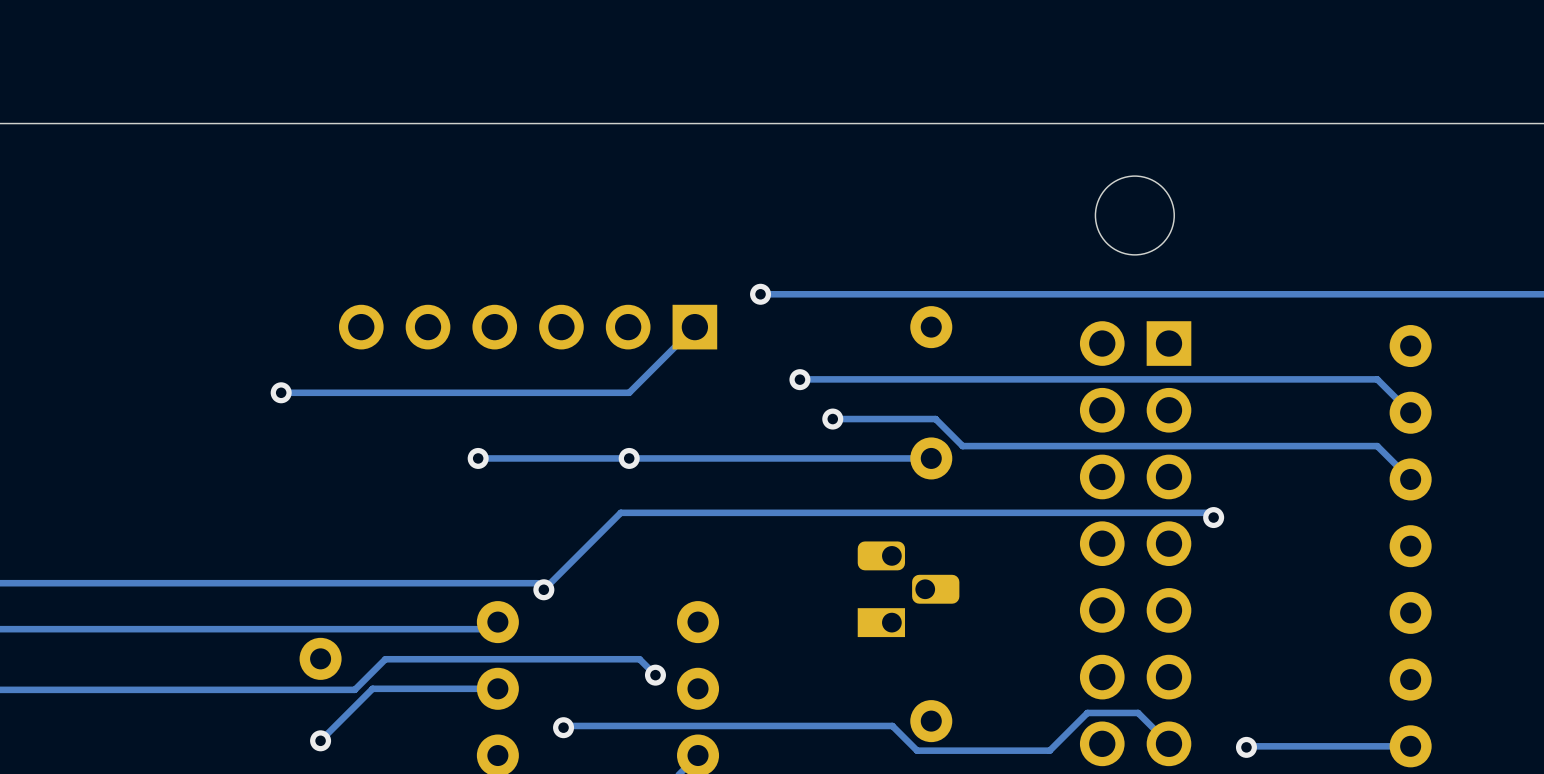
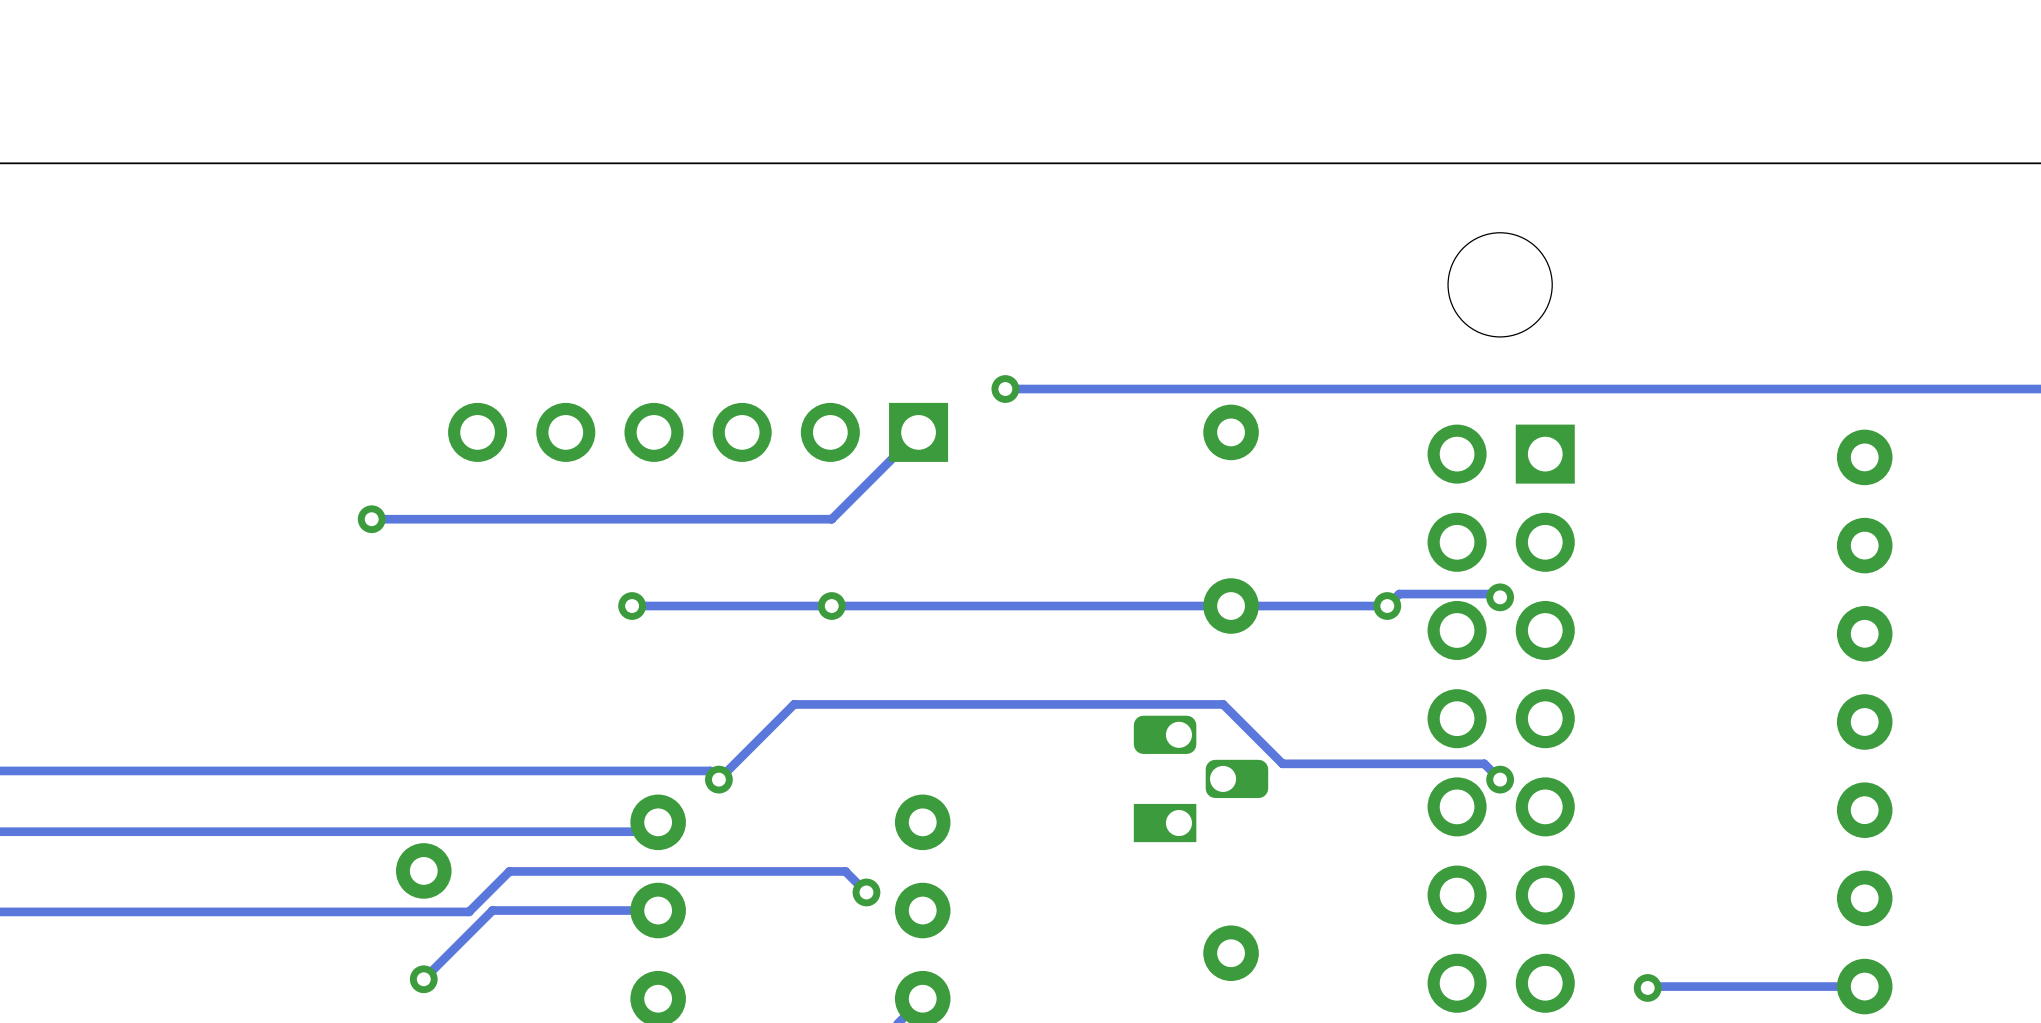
via: (799, 379) -> none
track: (800, 379) (1377, 379) (1410, 412) -> none
track: (832, 419) (935, 419) (962, 446) (1377, 446) (1410, 479) -> none
via: (832, 419) -> none
track: none -> (1500, 597) (1496, 594) (1399, 594) (1387, 606) (1231, 606)
via: none -> (1500, 597)
via: none -> (1387, 606)
track: (1213, 517) (1208, 512) (620, 512) (600, 532) -> (1500, 779) (1484, 763) (1282, 763) (1223, 704) (794, 704)
via: (1213, 517) -> none
via: none -> (1500, 779)
track: (563, 727) (565, 725) (892, 725) (917, 750) (1049, 750) (1087, 712) (1138, 712) (1168, 743) -> none
via: (563, 727) -> none

